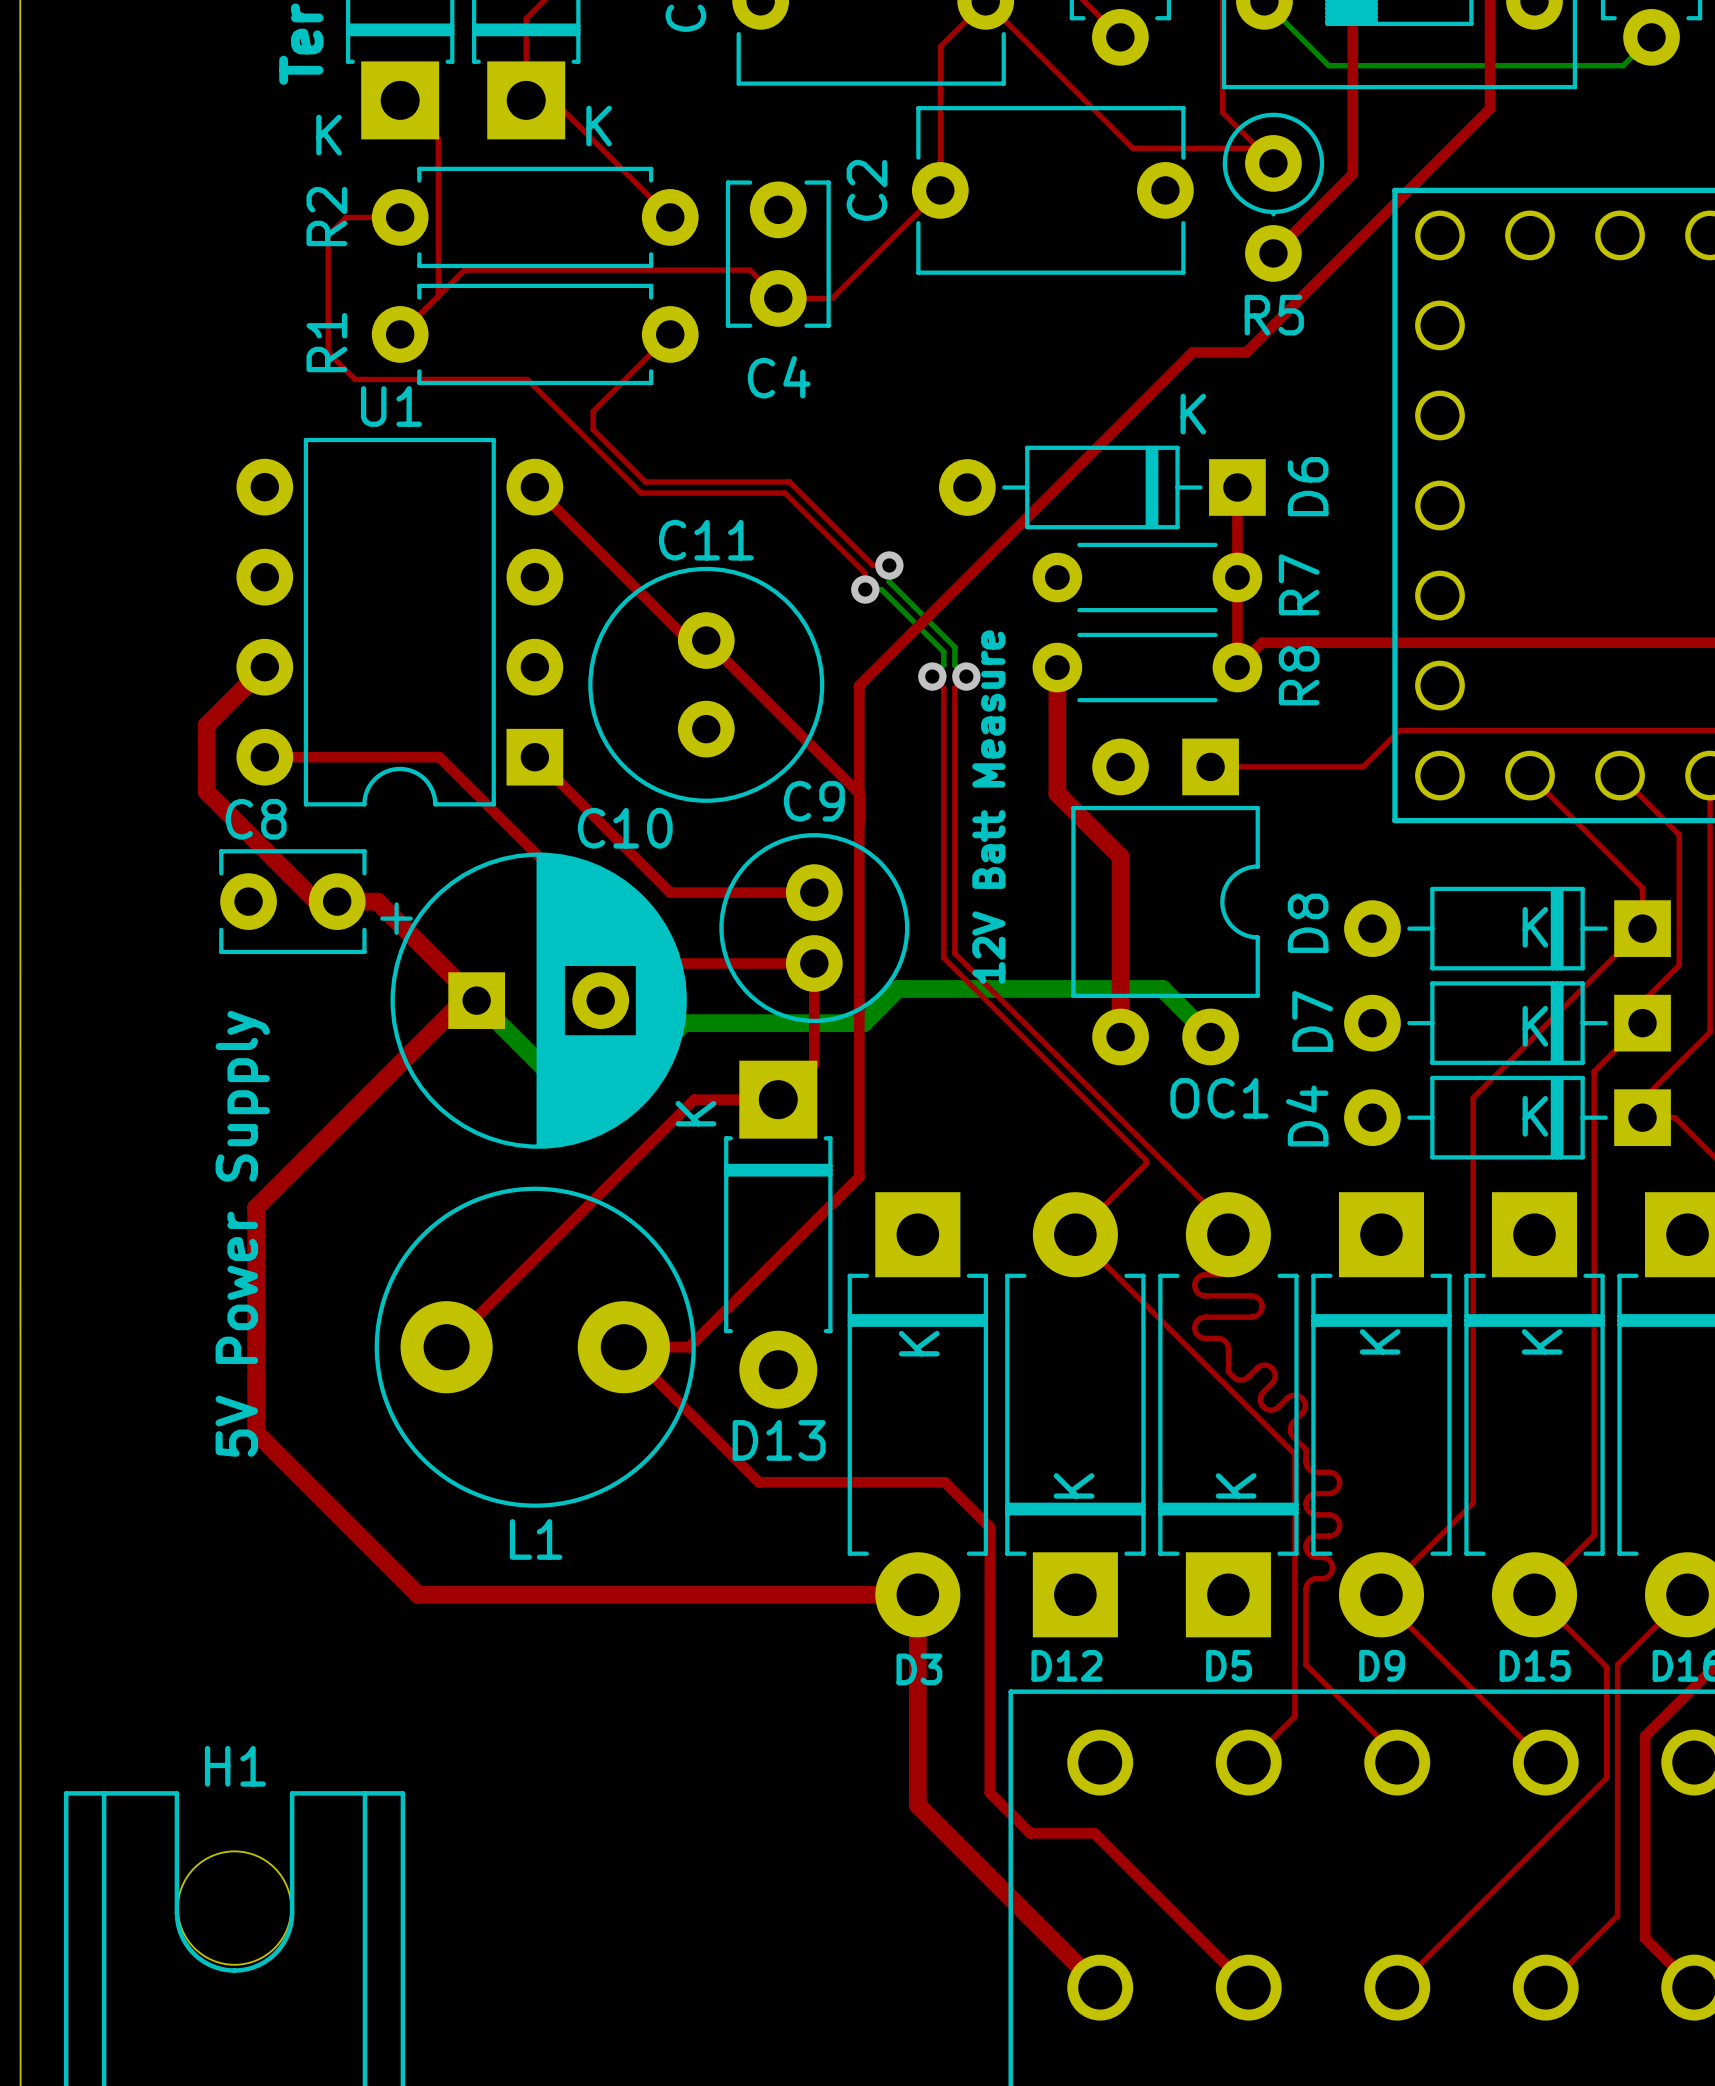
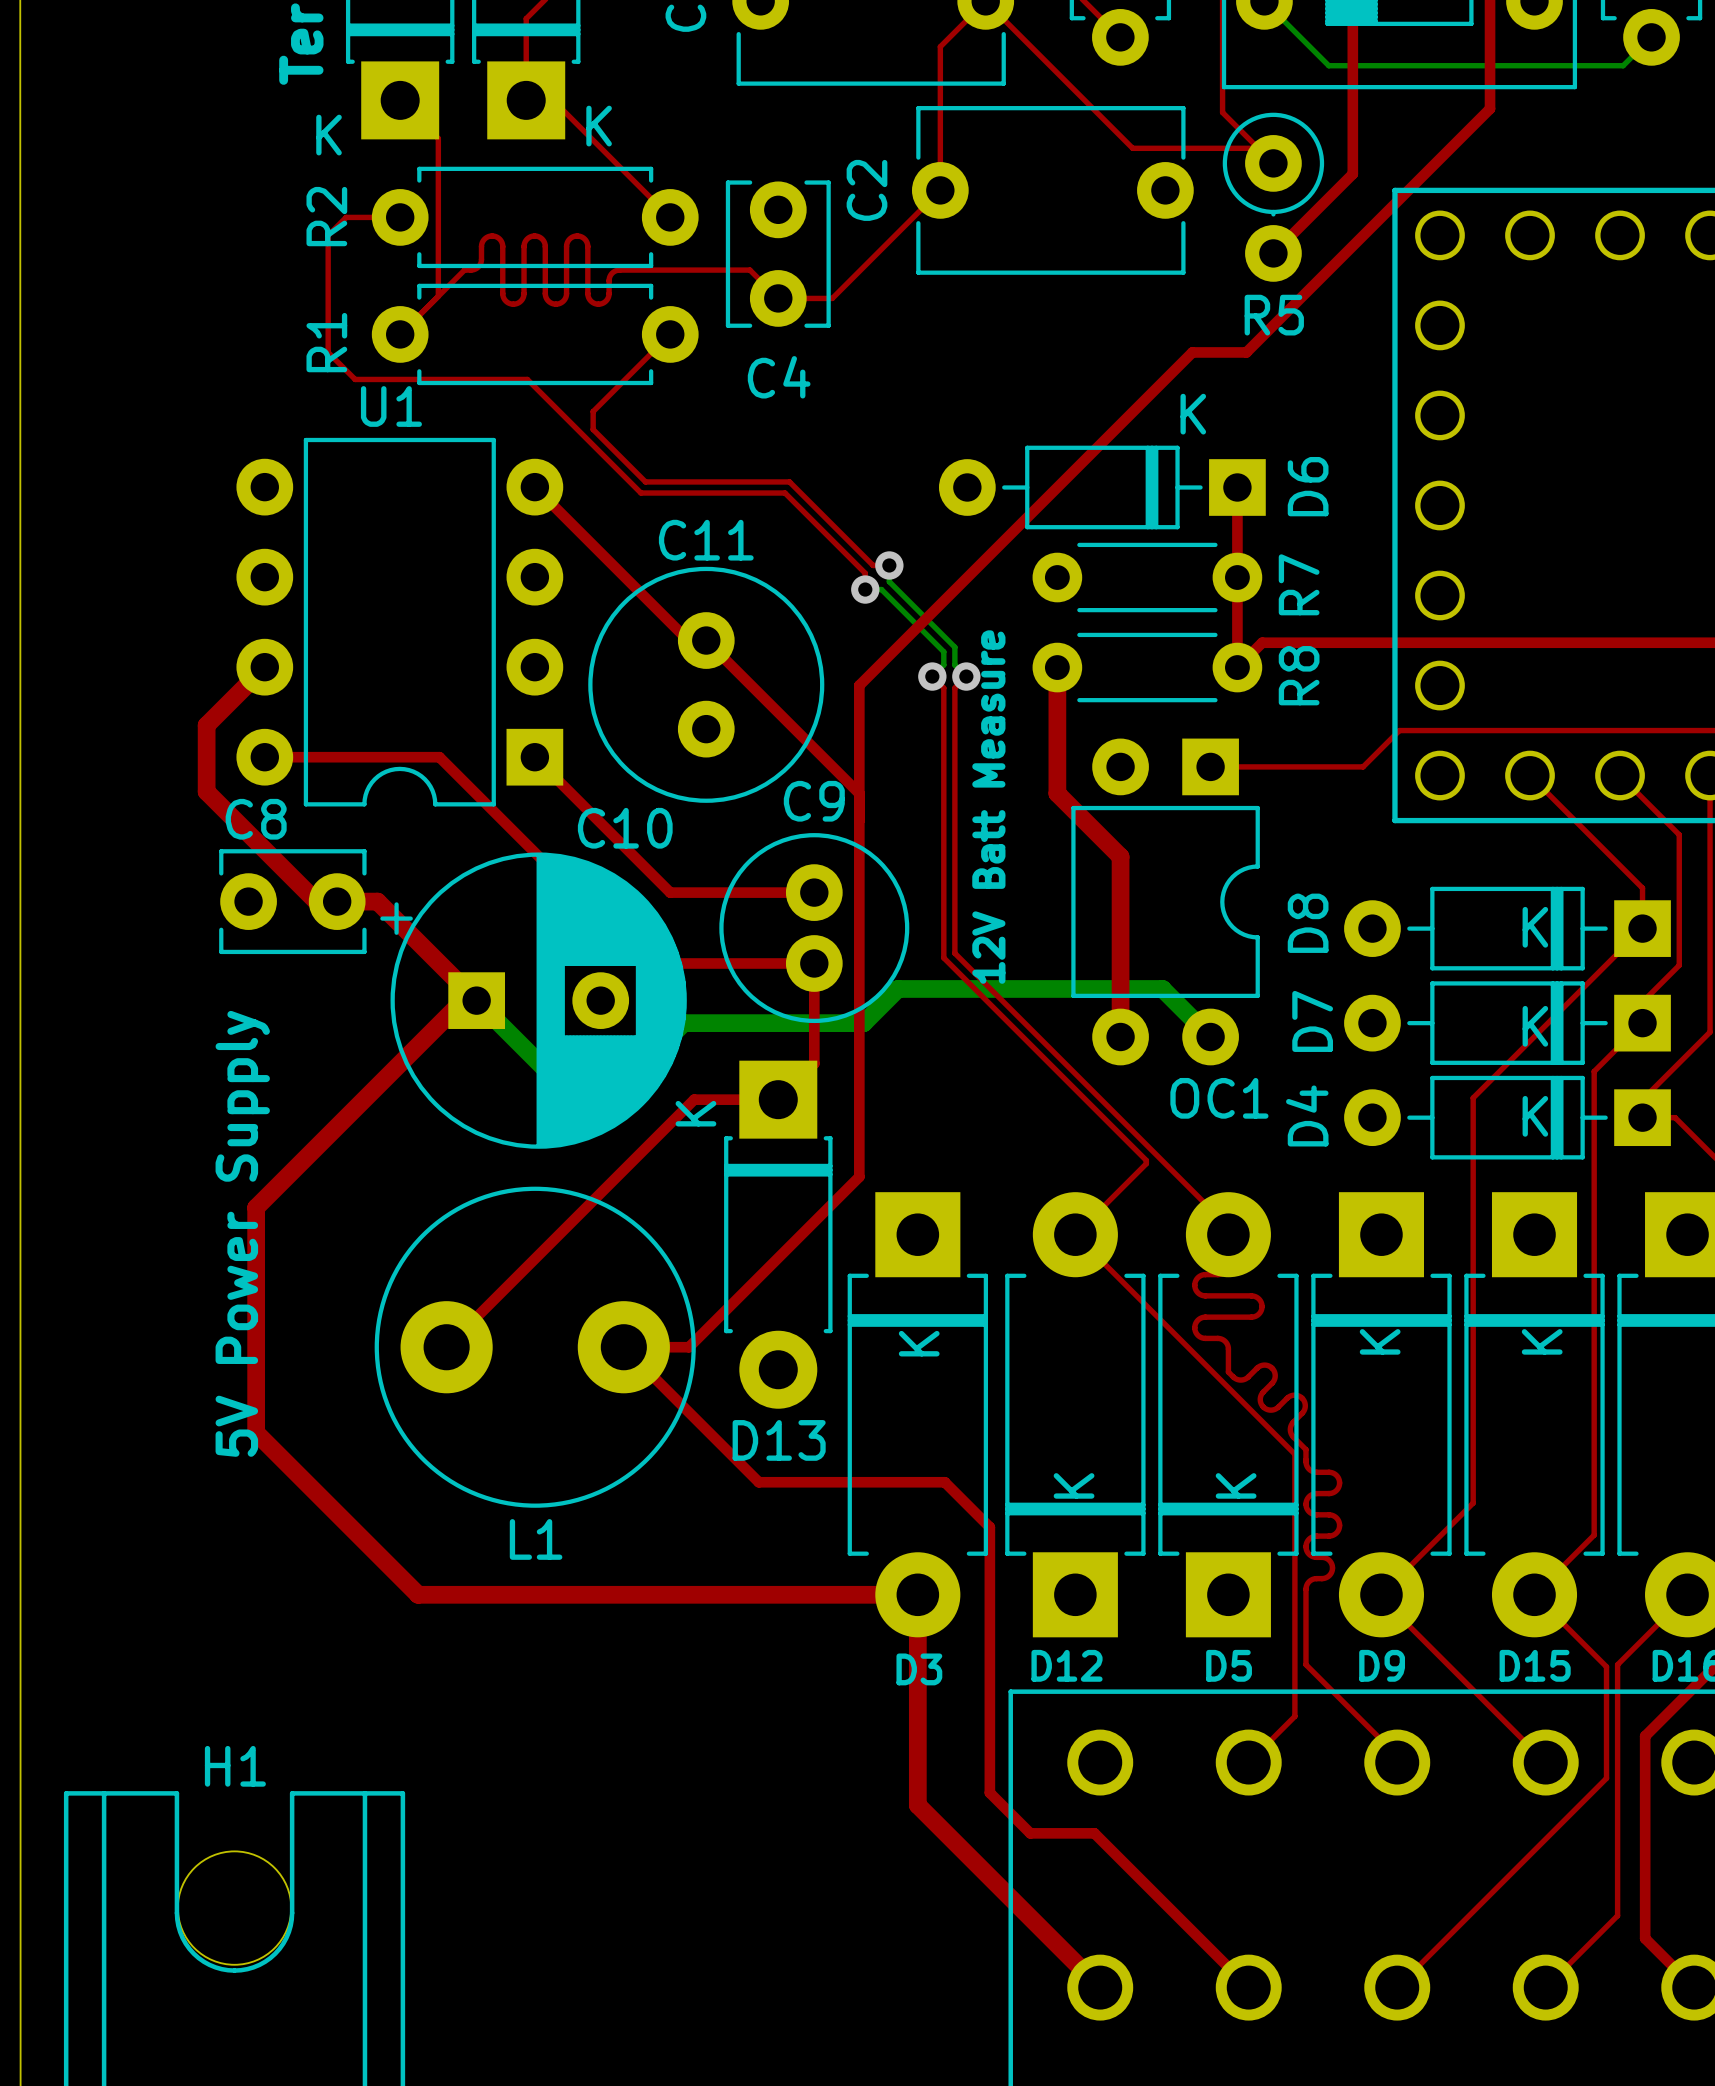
top track: (470, 270) (619, 270) -> (470, 270) (480, 264) (482, 242) (485, 238) (492, 235) (498, 238) (502, 243) (502, 294) (505, 301) (510, 303) (518, 302) (523, 296) (524, 245) (527, 239) (531, 236) (539, 237) (544, 243) (545, 294) (551, 303) (560, 303) (566, 296) (566, 245) (573, 236) (581, 236) (587, 243) (587, 294) (591, 302) (599, 304) (606, 300) (609, 276) (614, 271) (619, 270)

